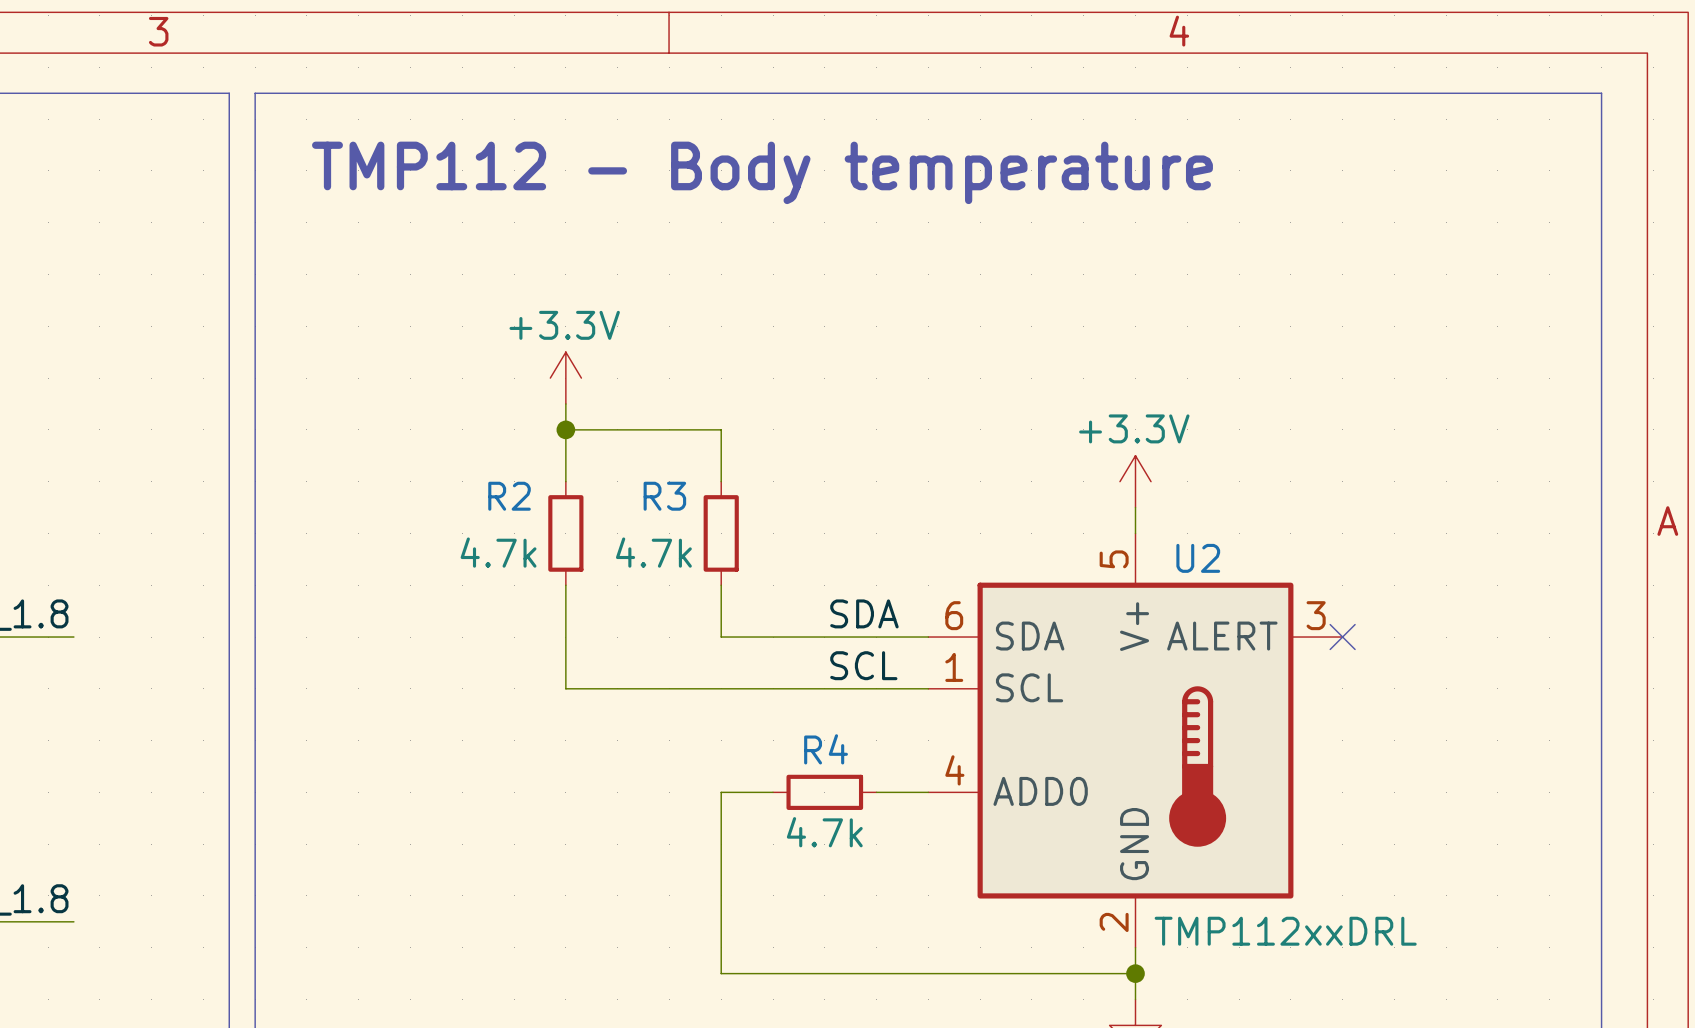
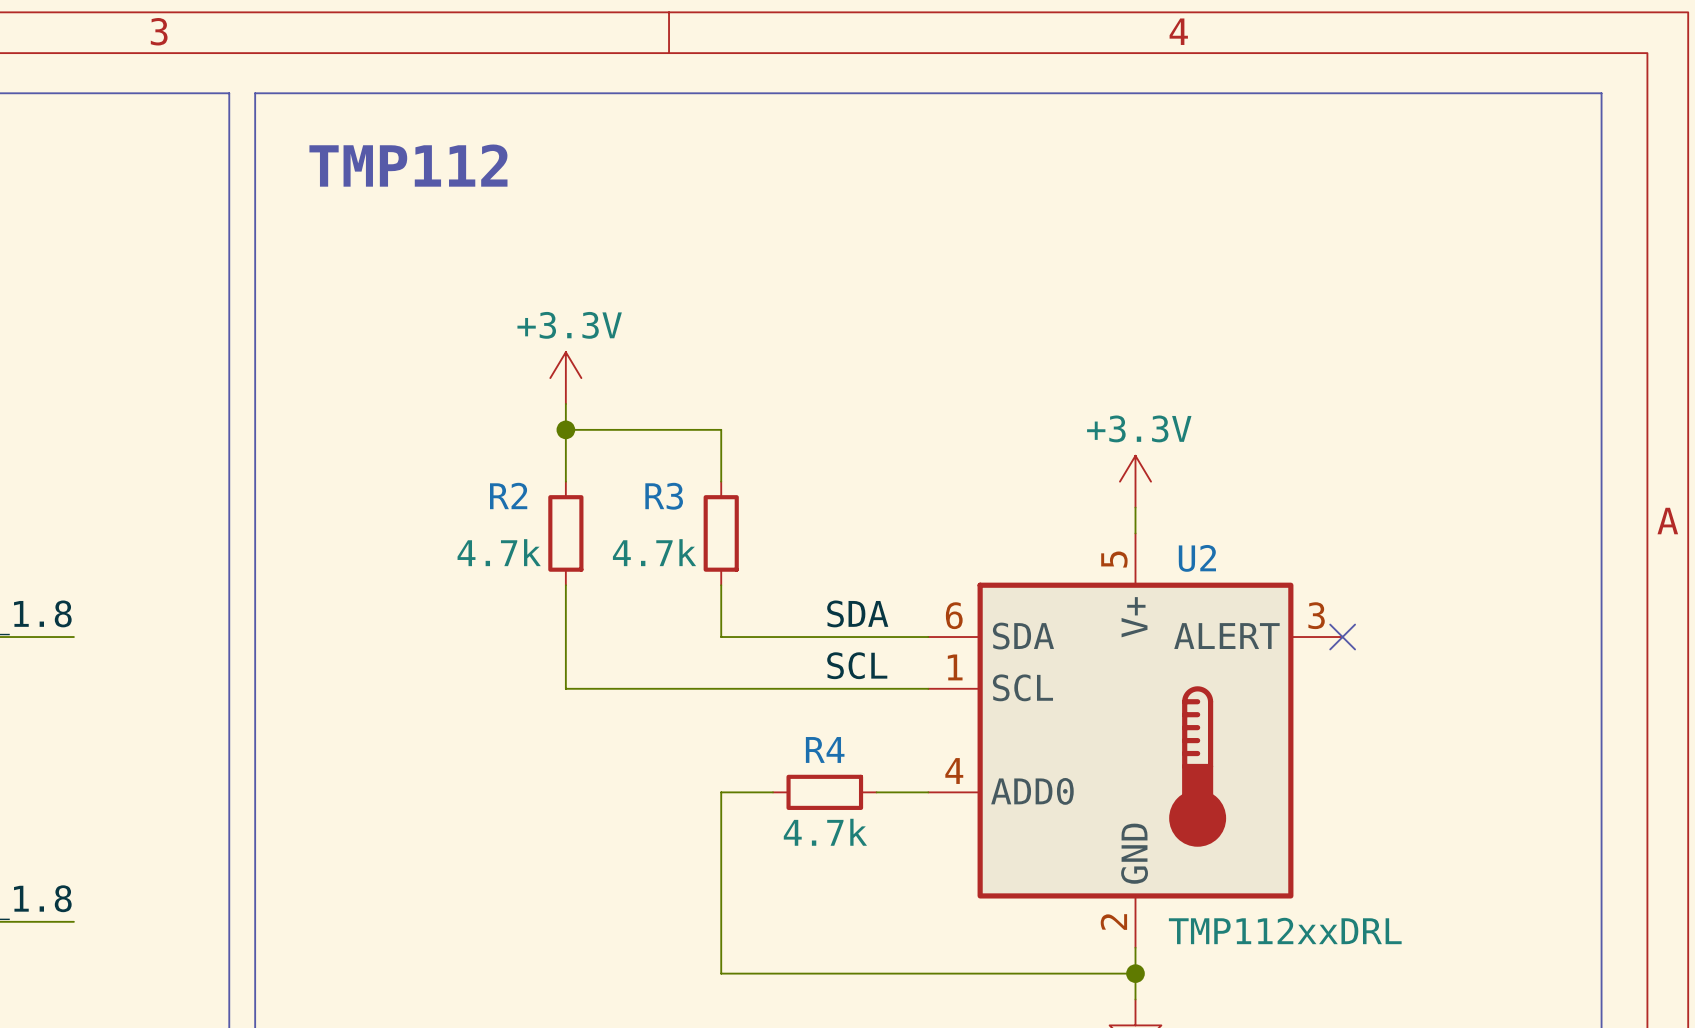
text: TMP112 - Body temperature (762, 172) -> TMP112 (408, 165)

